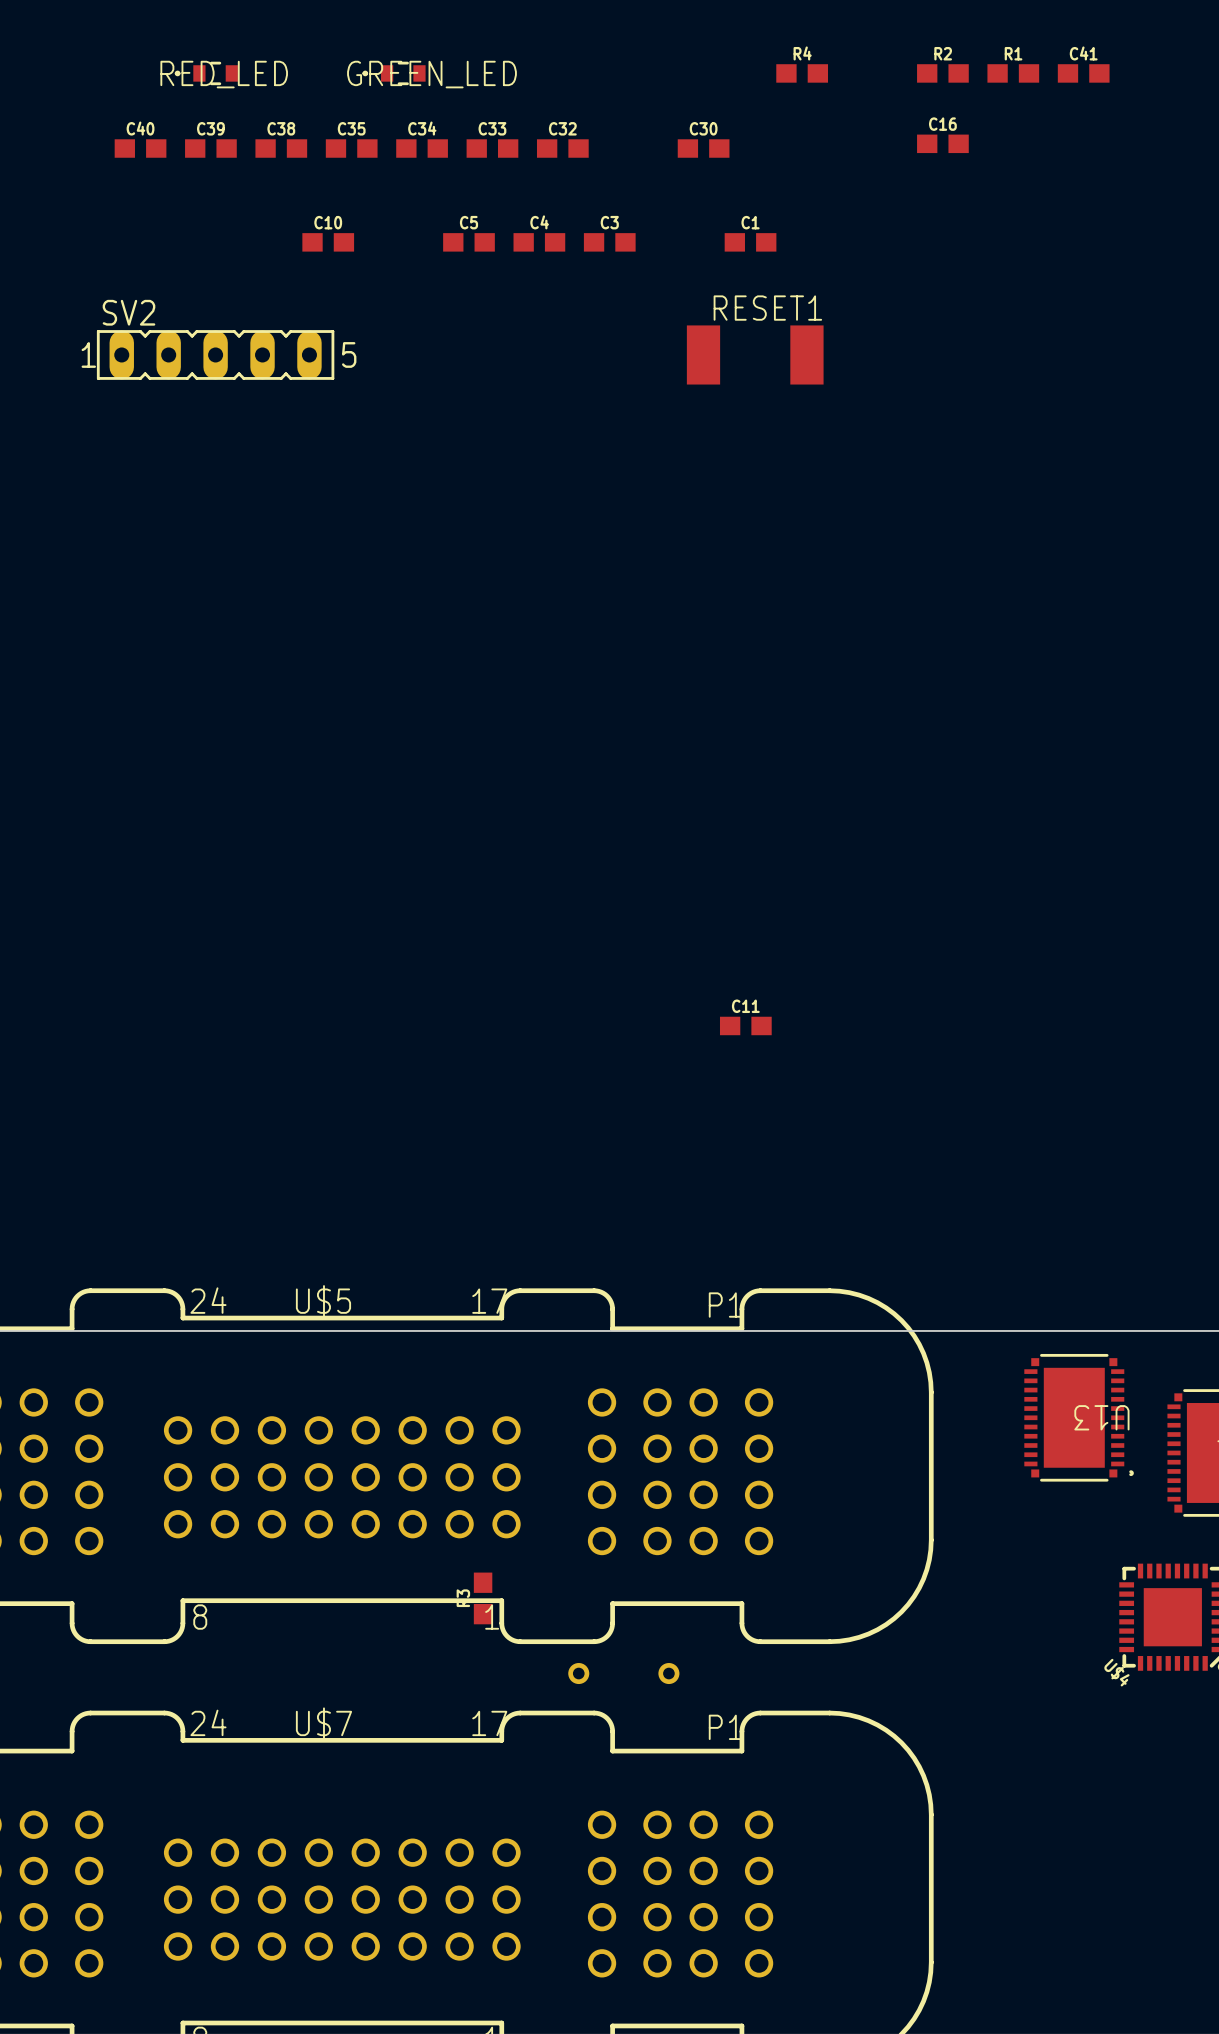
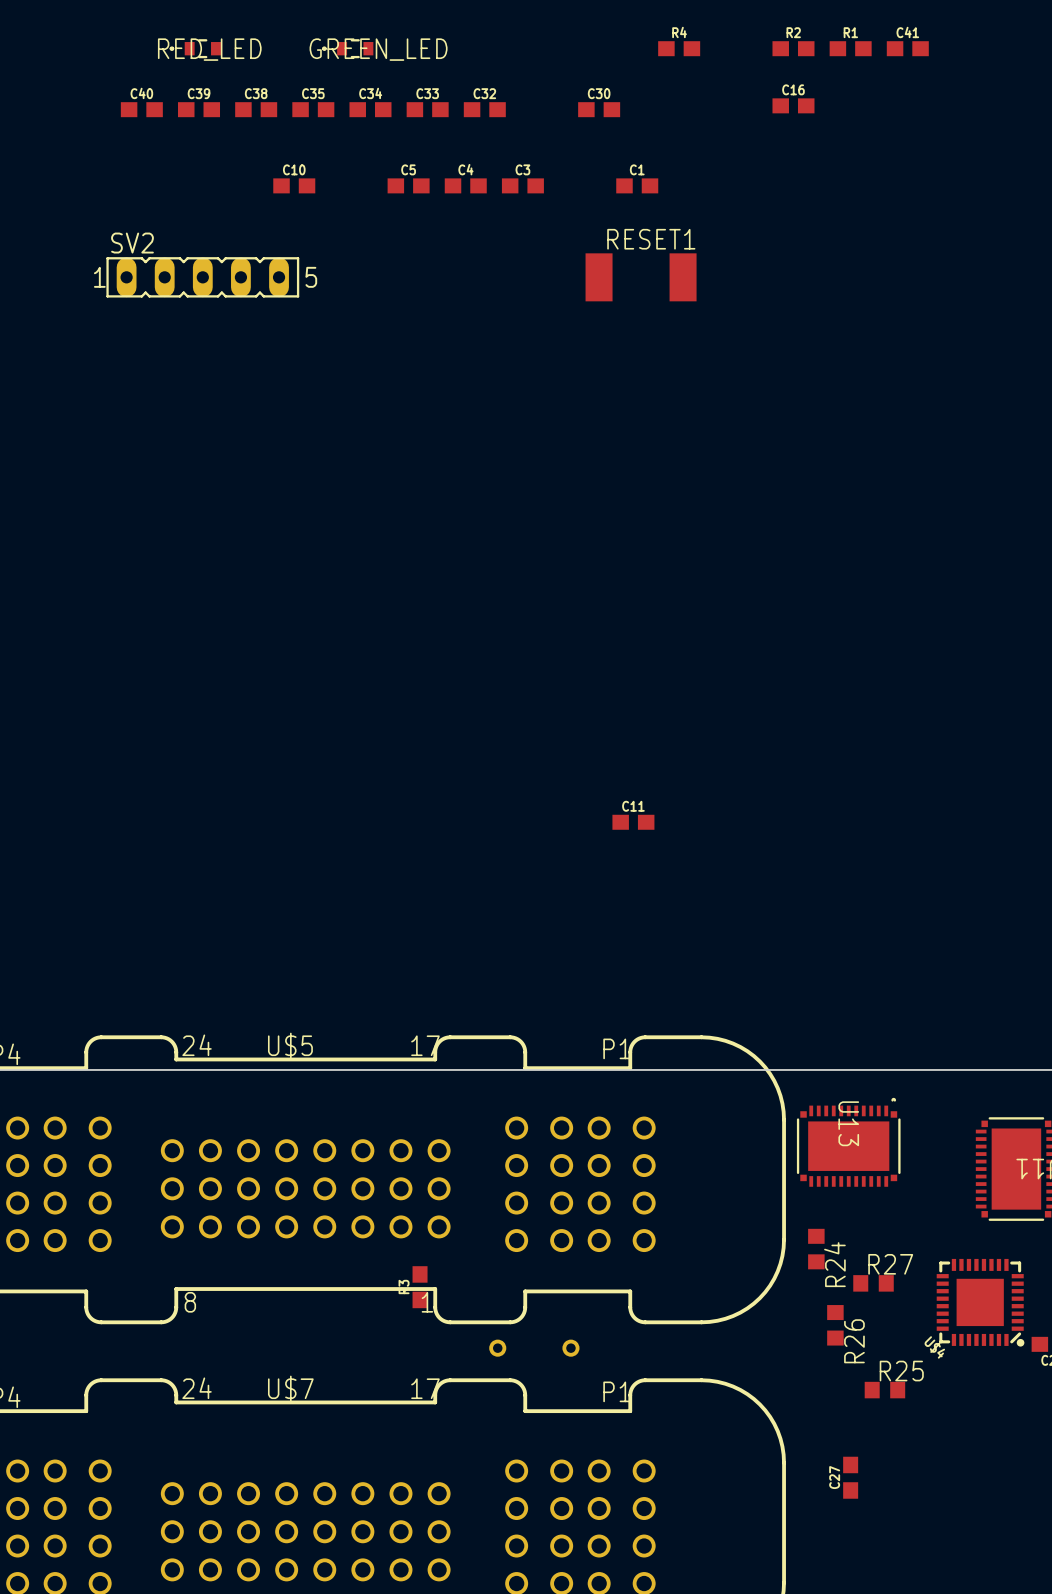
U13 rotation: 0° (1079, 1417) -> 90° counterclockwise (848, 1142)
R24: none -> (816, 1249)
R27: none -> (873, 1283)
R26: none -> (835, 1325)
R25: none -> (884, 1390)
C27: none -> (850, 1477)

